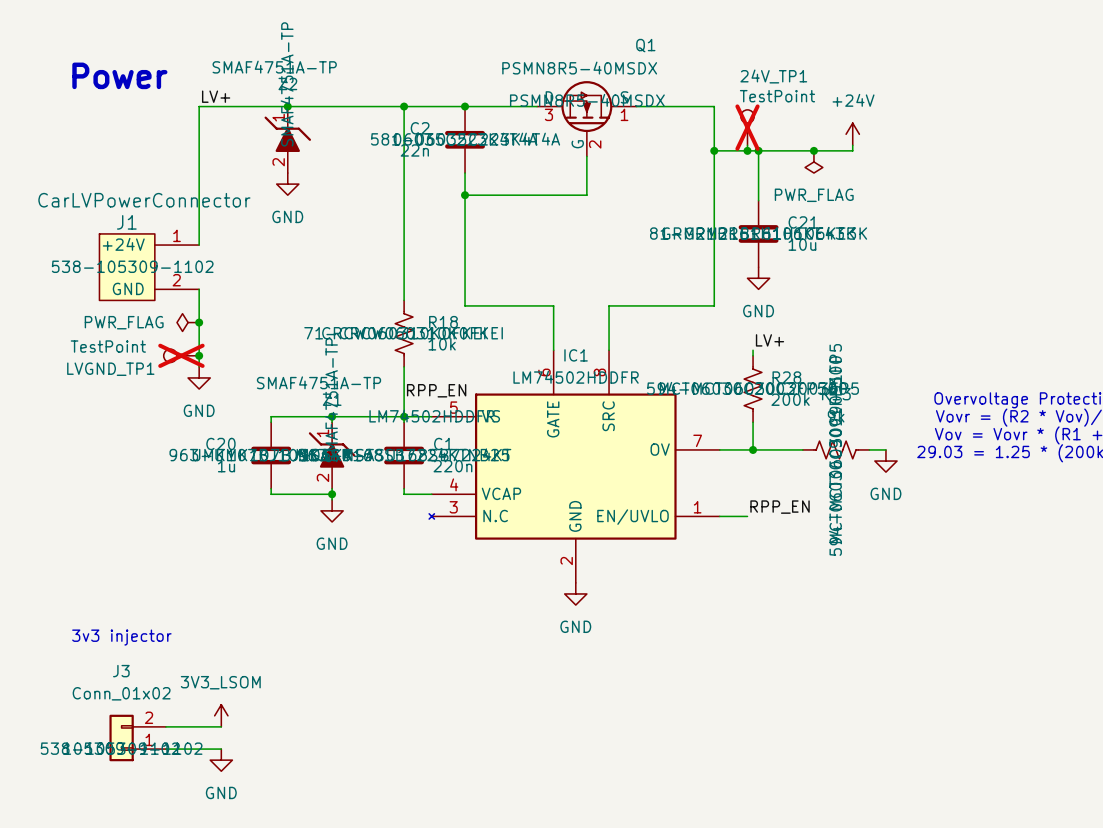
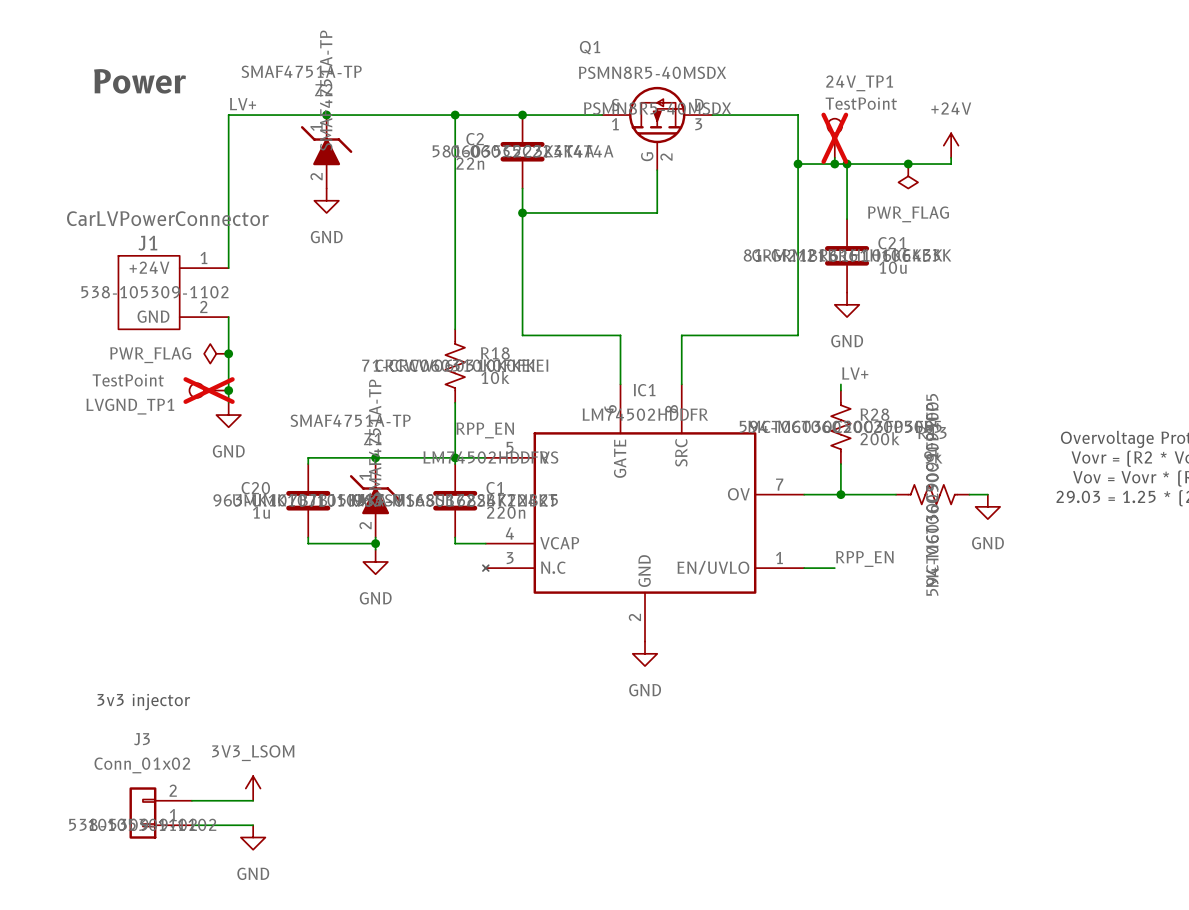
Q1 flip: as is (586, 106) -> left-right (657, 115)

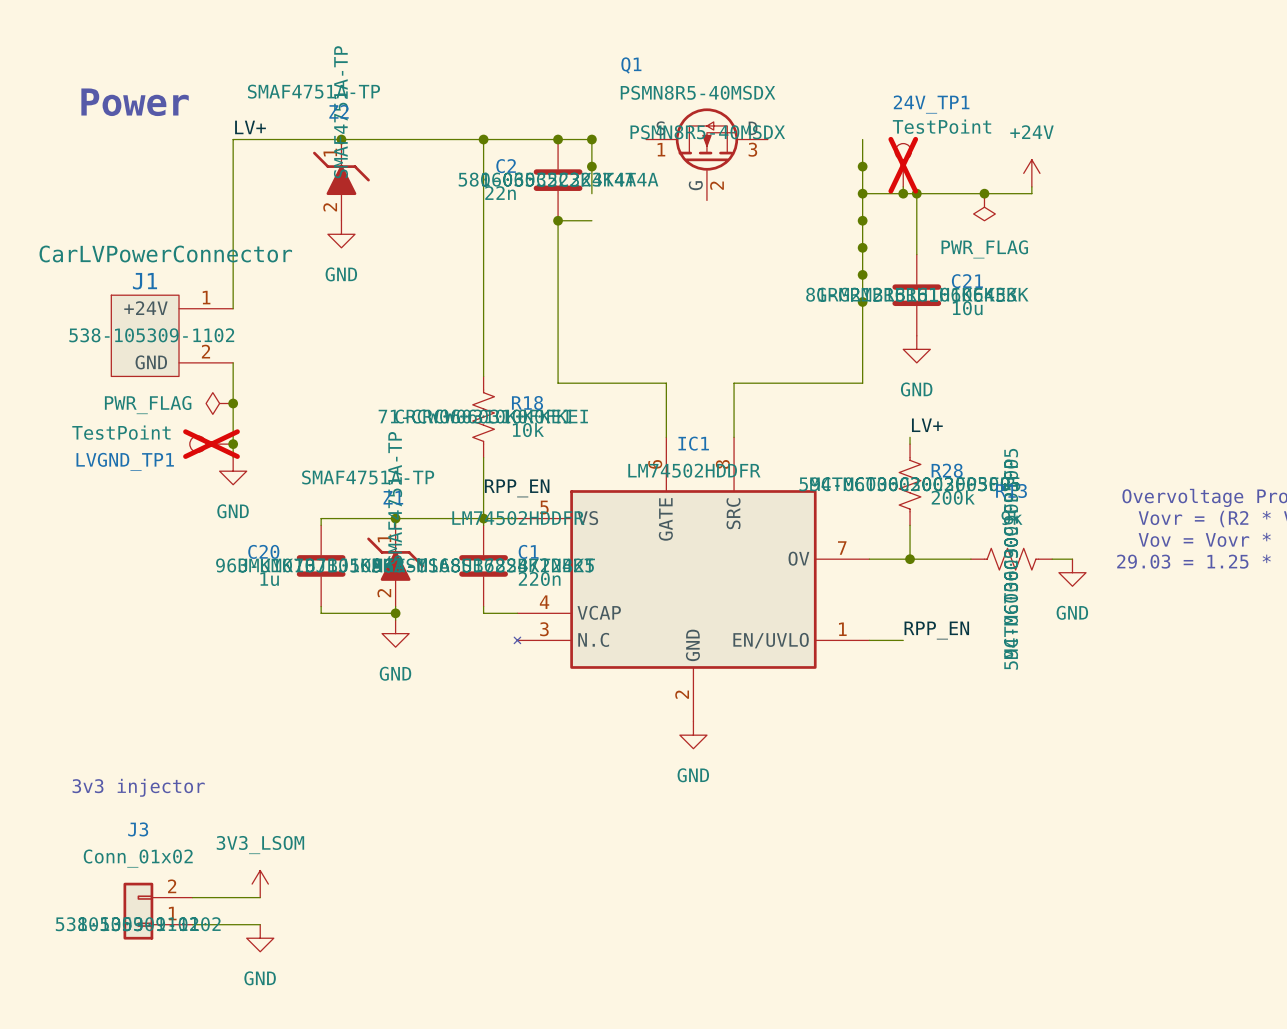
wire: (553, 115) (602, 115) -> (591, 139) (591, 193)
junction: none -> (591, 139)
wire: (712, 115) (798, 115) -> none
junction: none -> (591, 166)
junction: none -> (862, 166)
wire: (657, 170) (657, 212) (522, 212) -> none
wire: none -> (558, 220) (591, 220)
junction: none -> (862, 220)
junction position: (522, 212) -> (558, 220)
junction: none -> (862, 247)
junction: none -> (862, 274)
junction: none -> (862, 301)

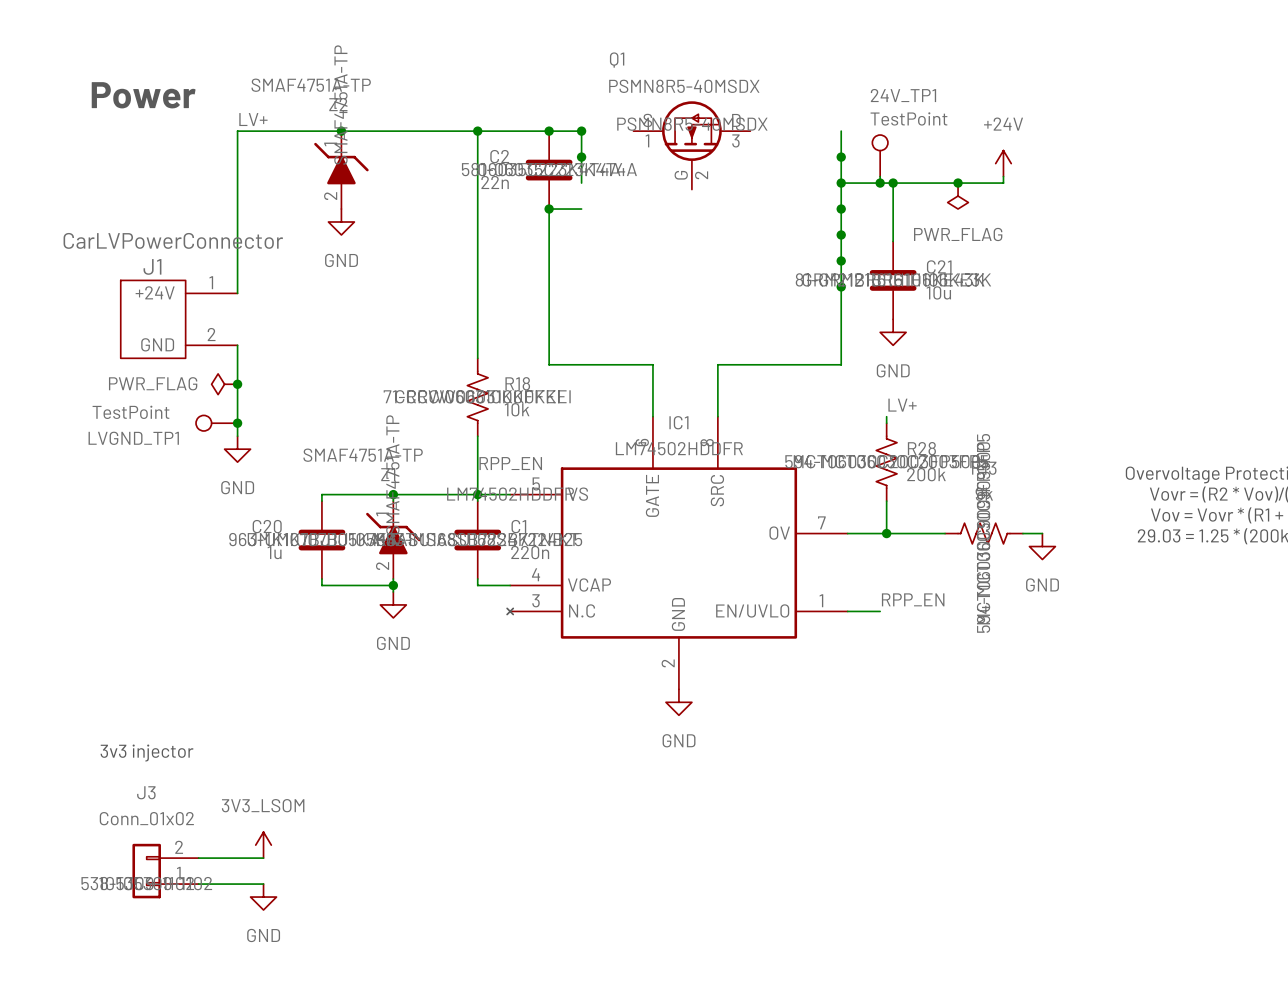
24V_TP1 do-not-place cross: (903, 165) -> none
J1 text: 538-105309-1102 (151, 335) -> none
LVGND_TP1 do-not-place cross: (211, 444) -> none

